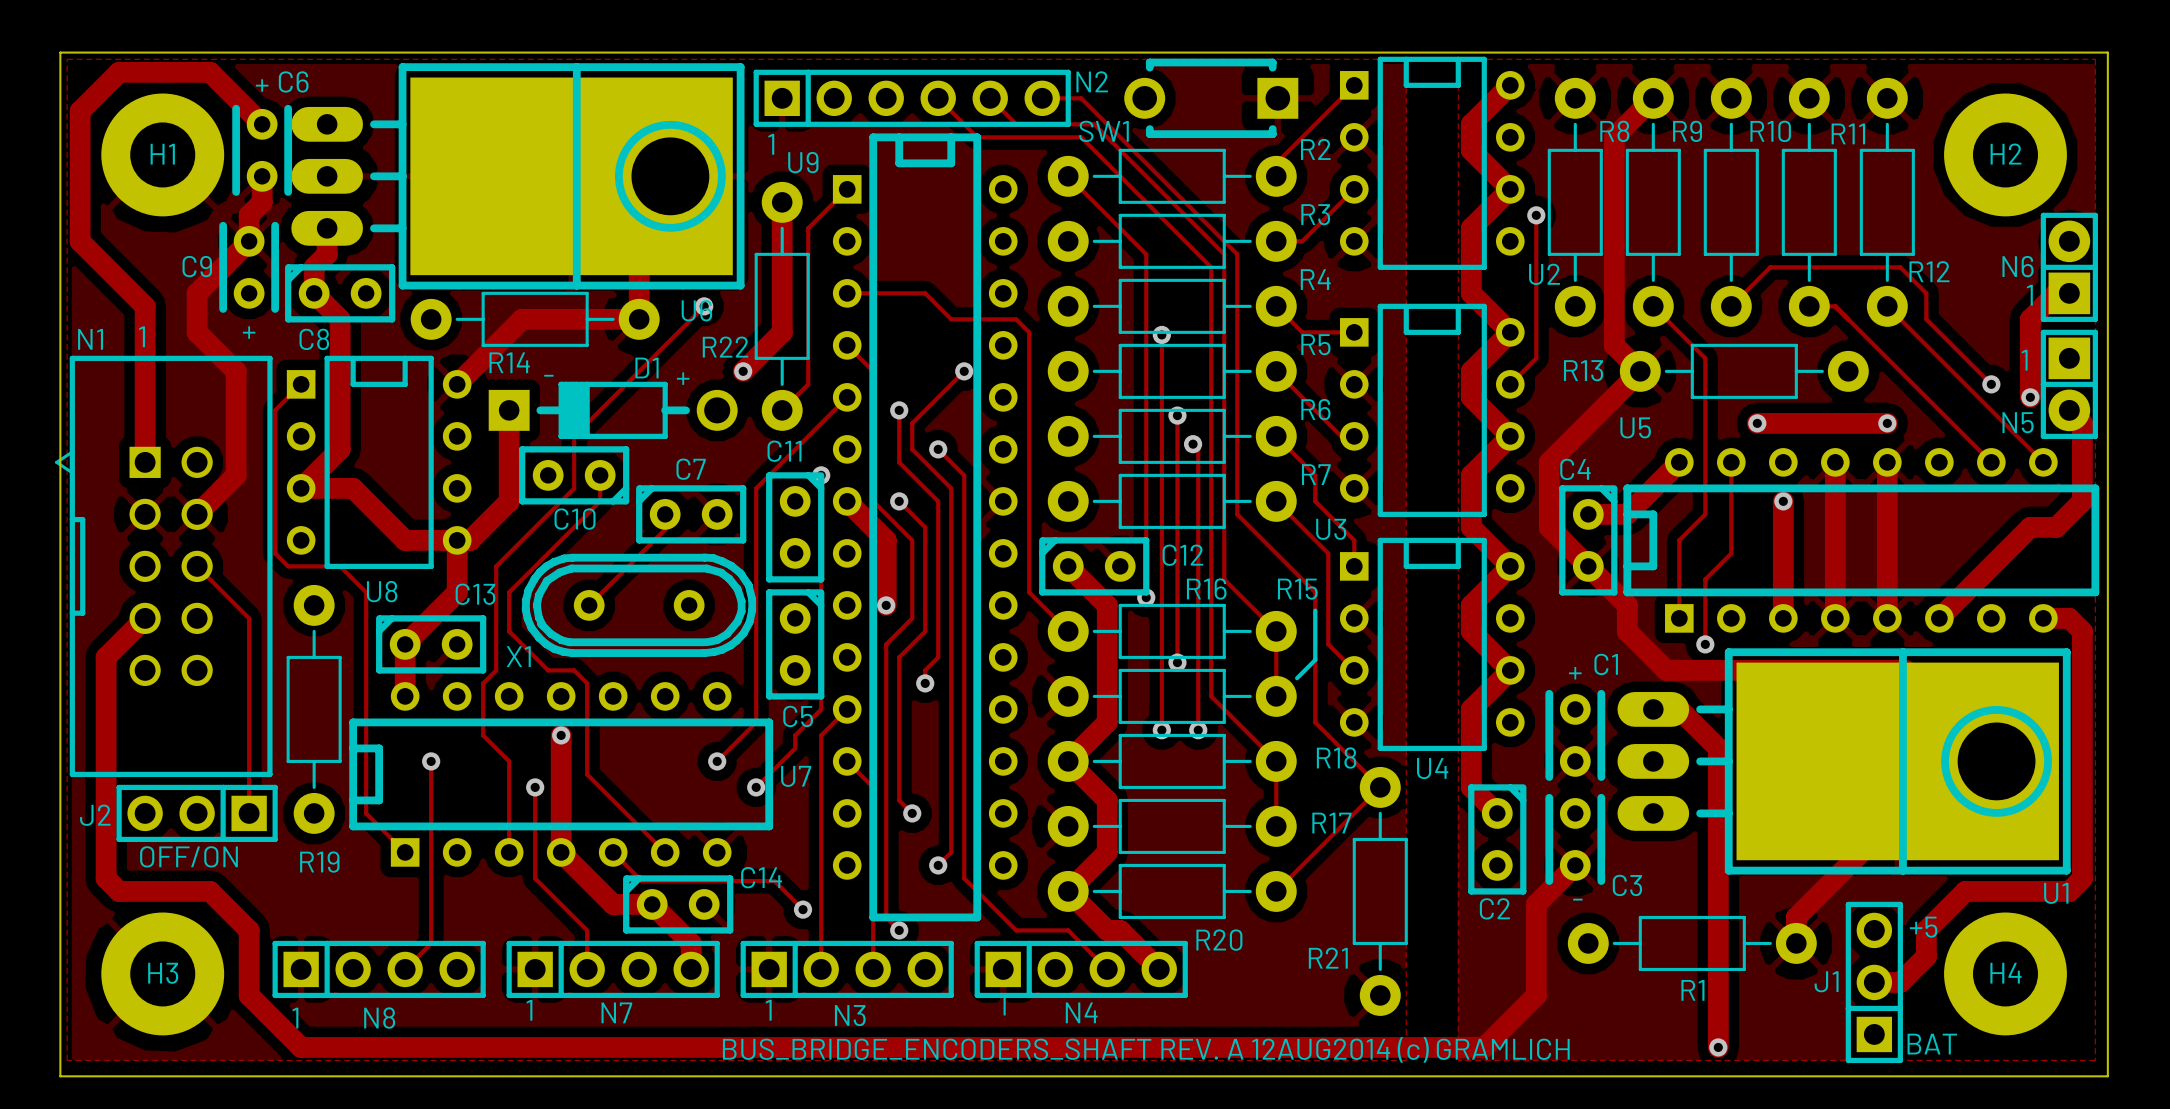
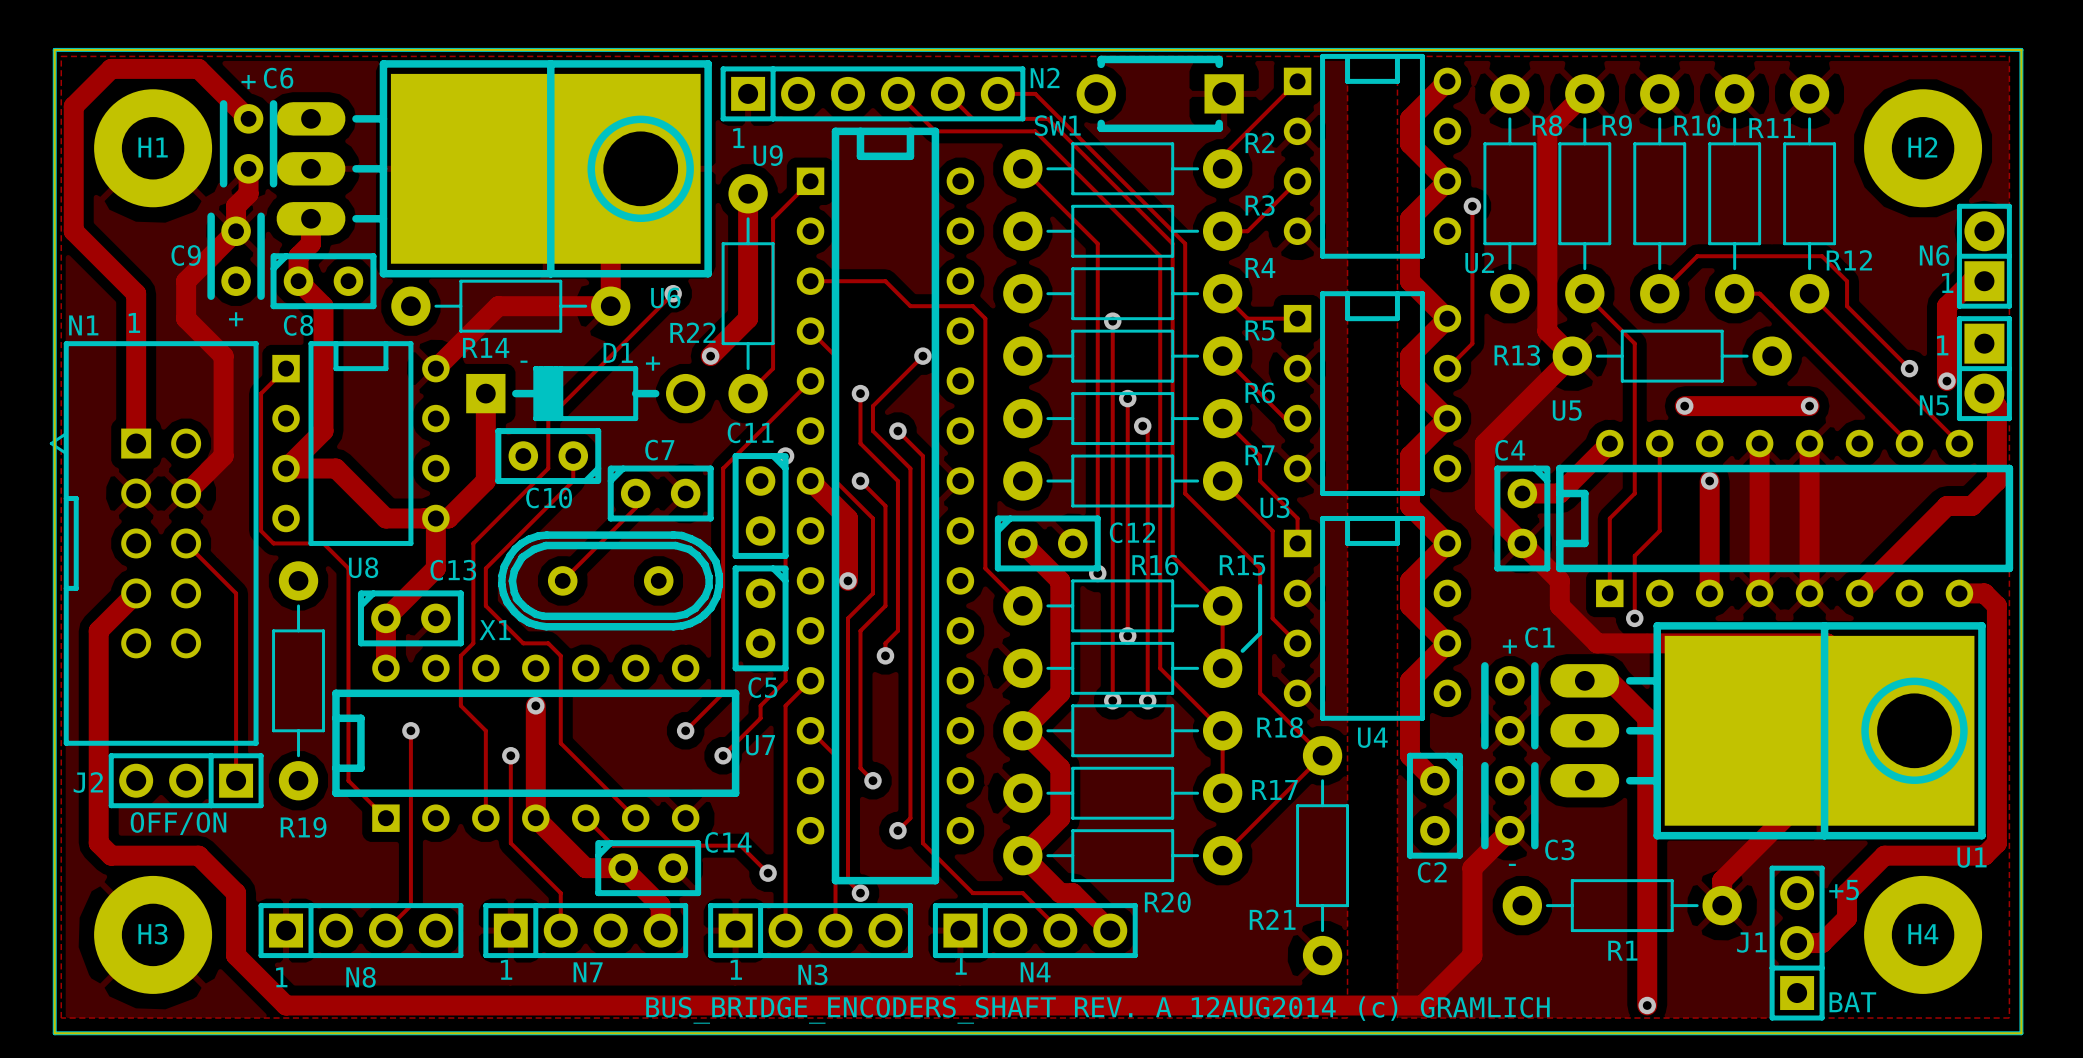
line: none -> (54, 49) (54, 1033) (2021, 1033) (2021, 49) (54, 49)

